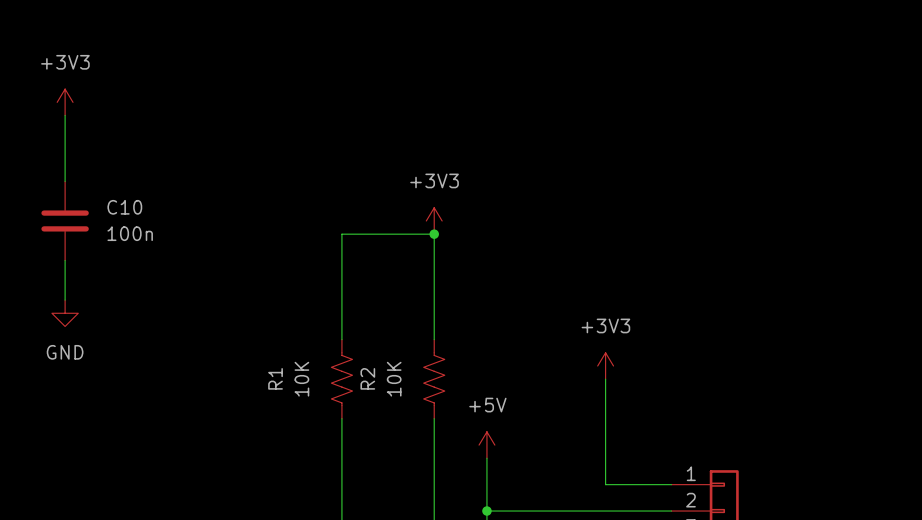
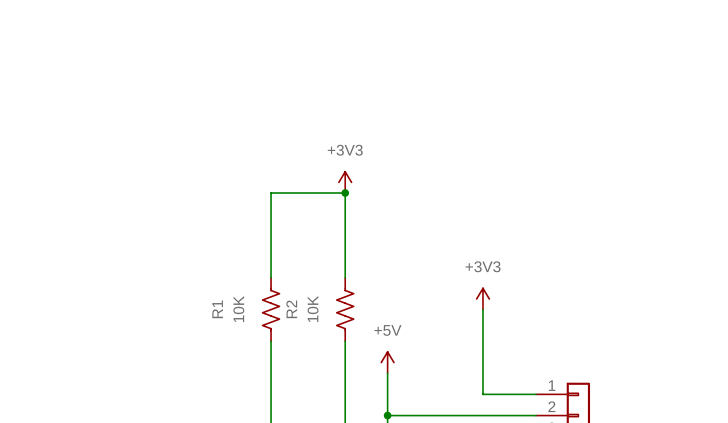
power symbol: +3V3 (65, 102) -> none
wire: (65, 115) (65, 181) -> none
C10: 100n (65, 220) -> none
wire: (65, 260) (65, 300) -> none
power symbol: GND (65, 313) -> none

